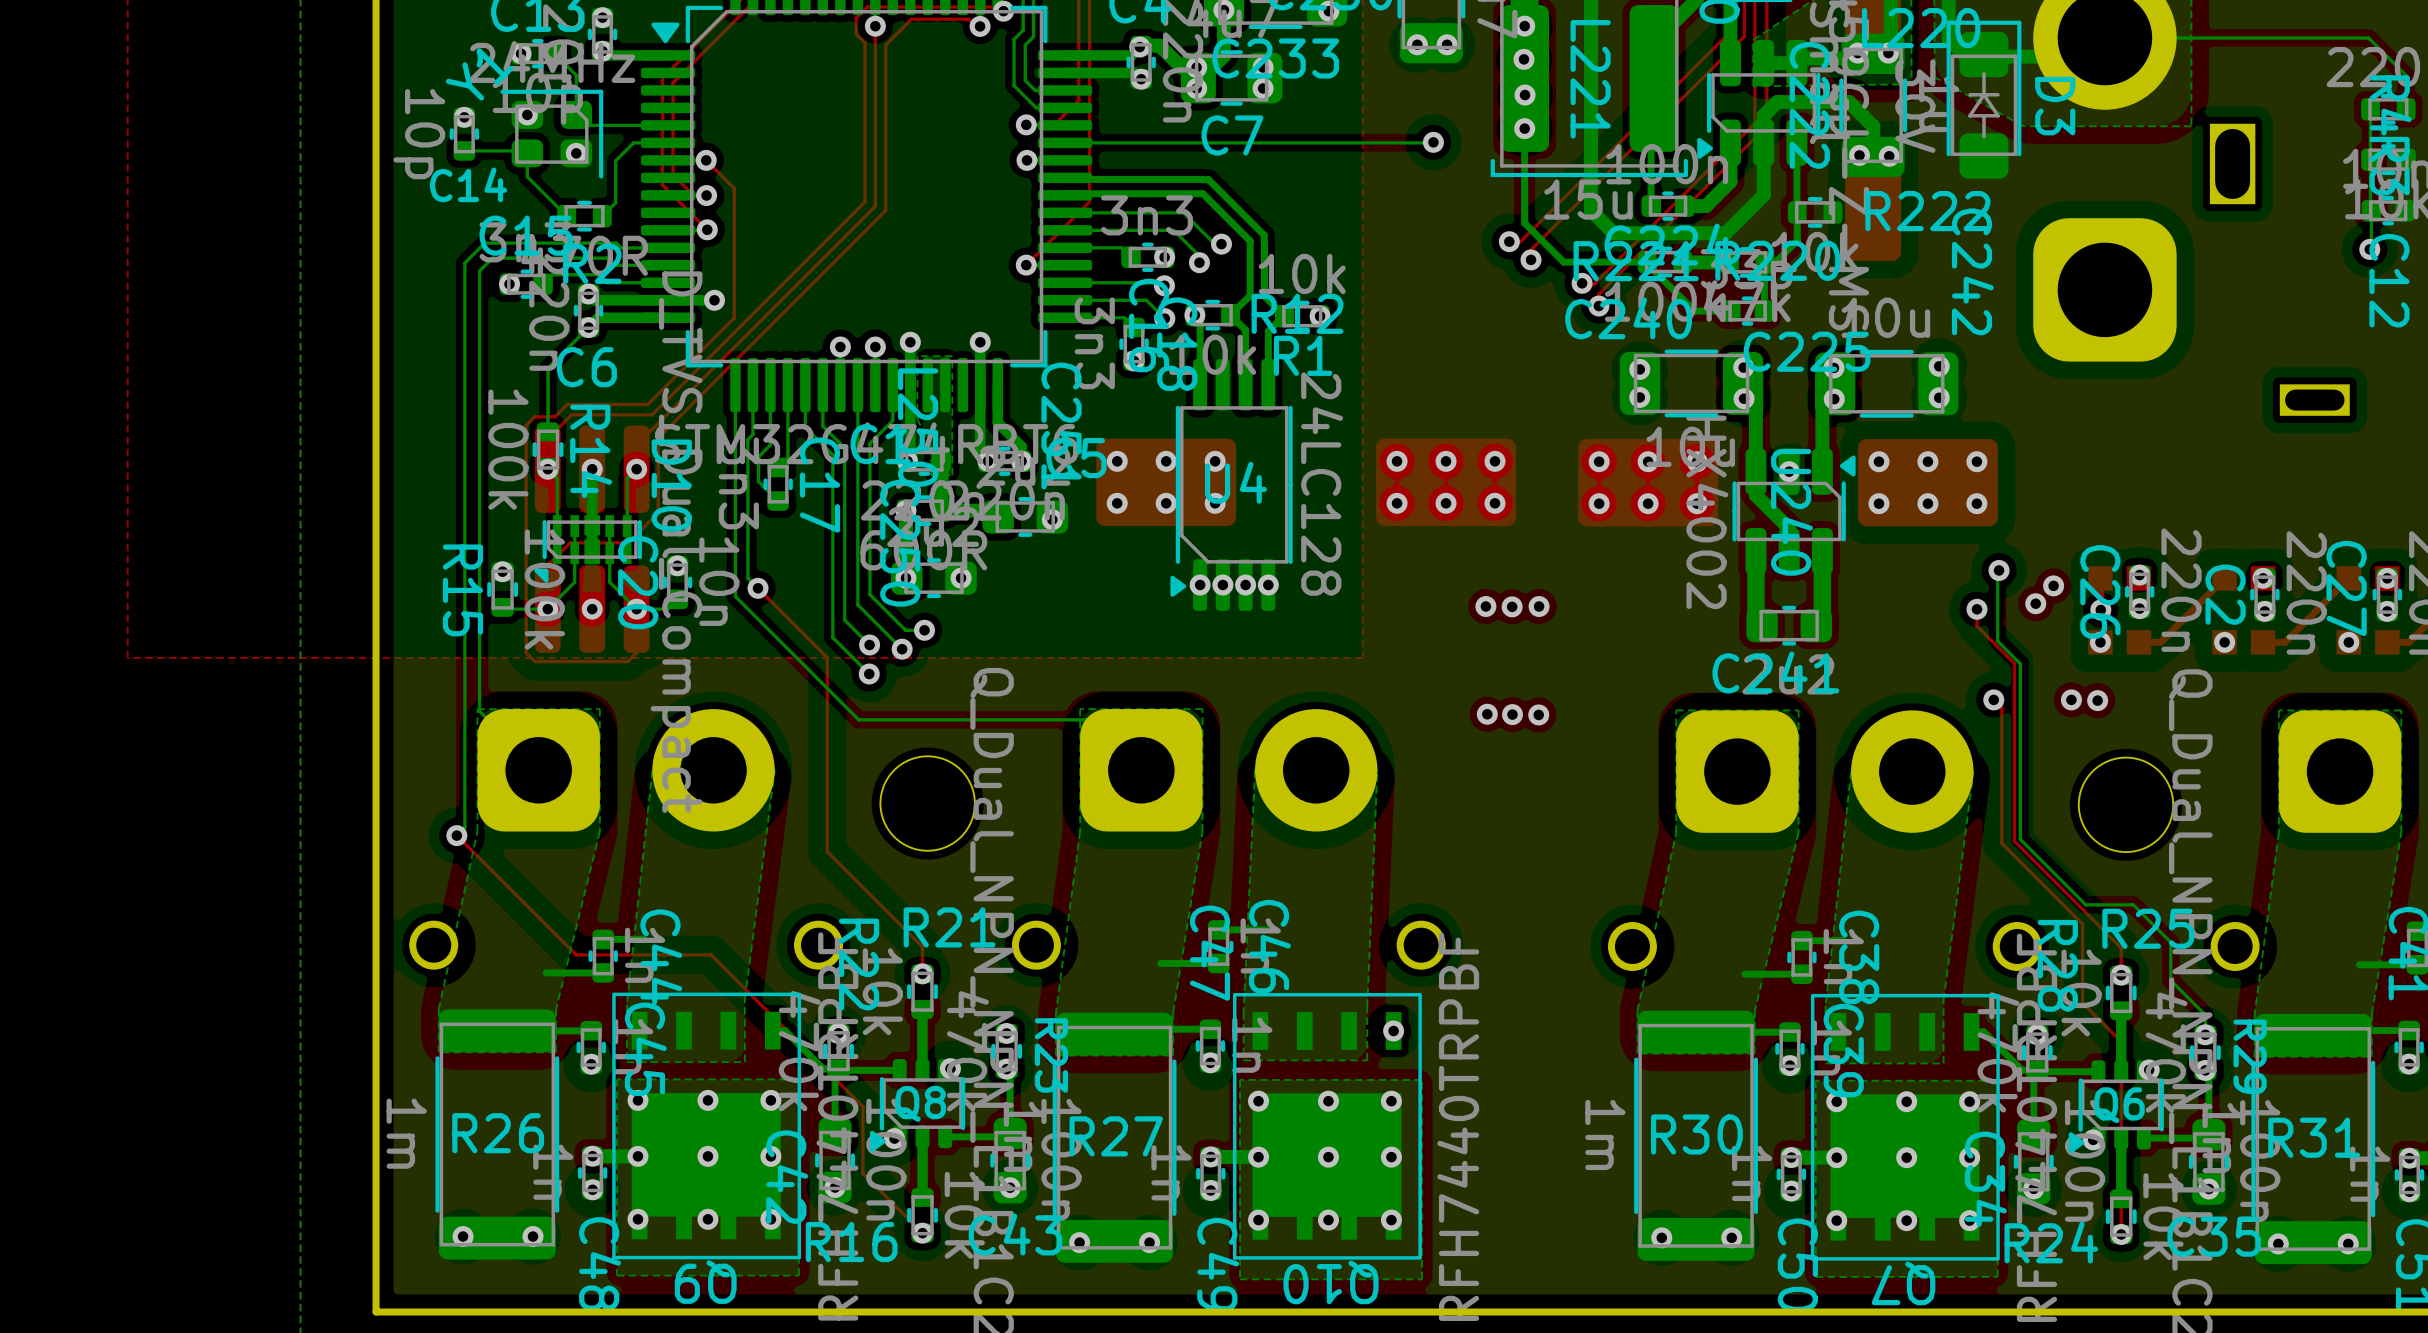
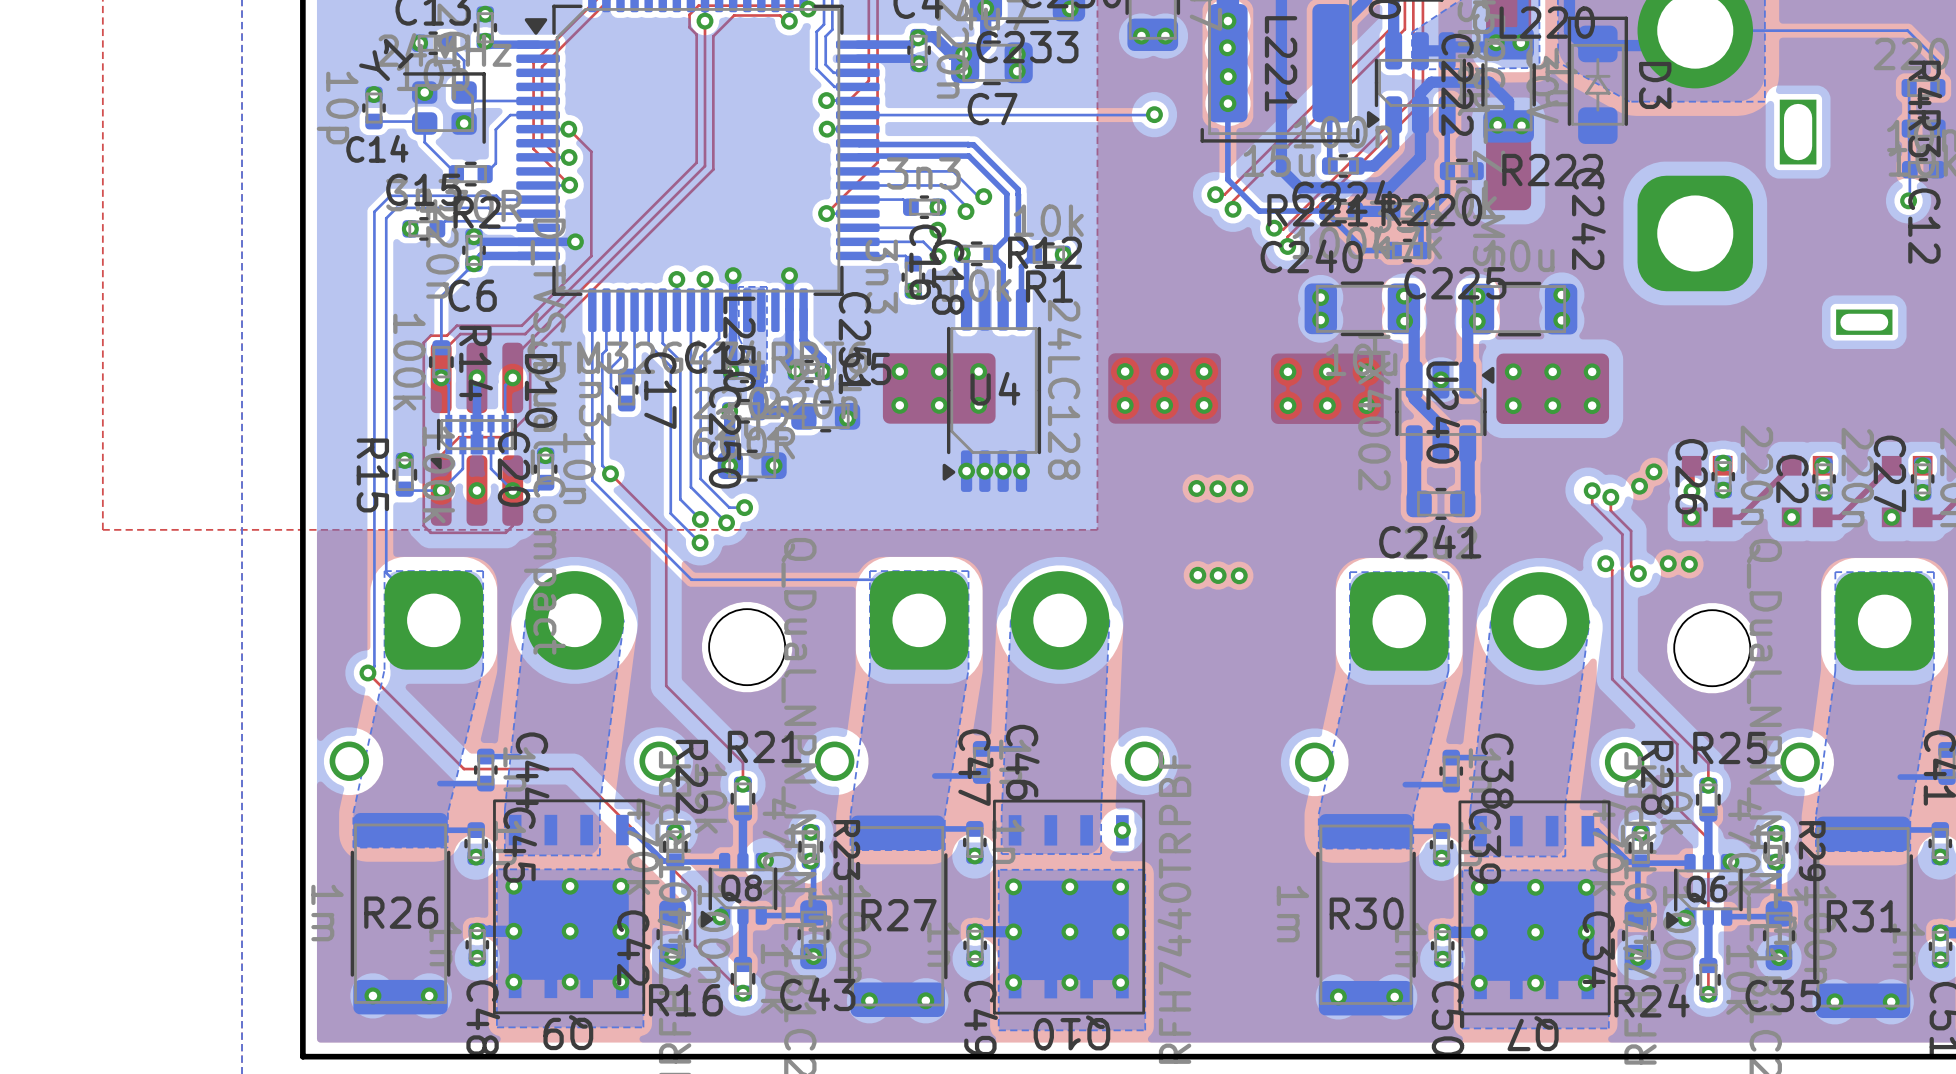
bottom track: (1999, 570) (1997, 641) (2020, 663) (2020, 839) (2085, 904) (2133, 904) (2170, 942) (2170, 980) (2205, 1015) (2205, 1034) -> none
via position: (1999, 570) -> (1610, 497)
top track: none -> (1610, 497) (1610, 510) (1631, 531) (1631, 566) (1638, 573)
via: none -> (1638, 573)

